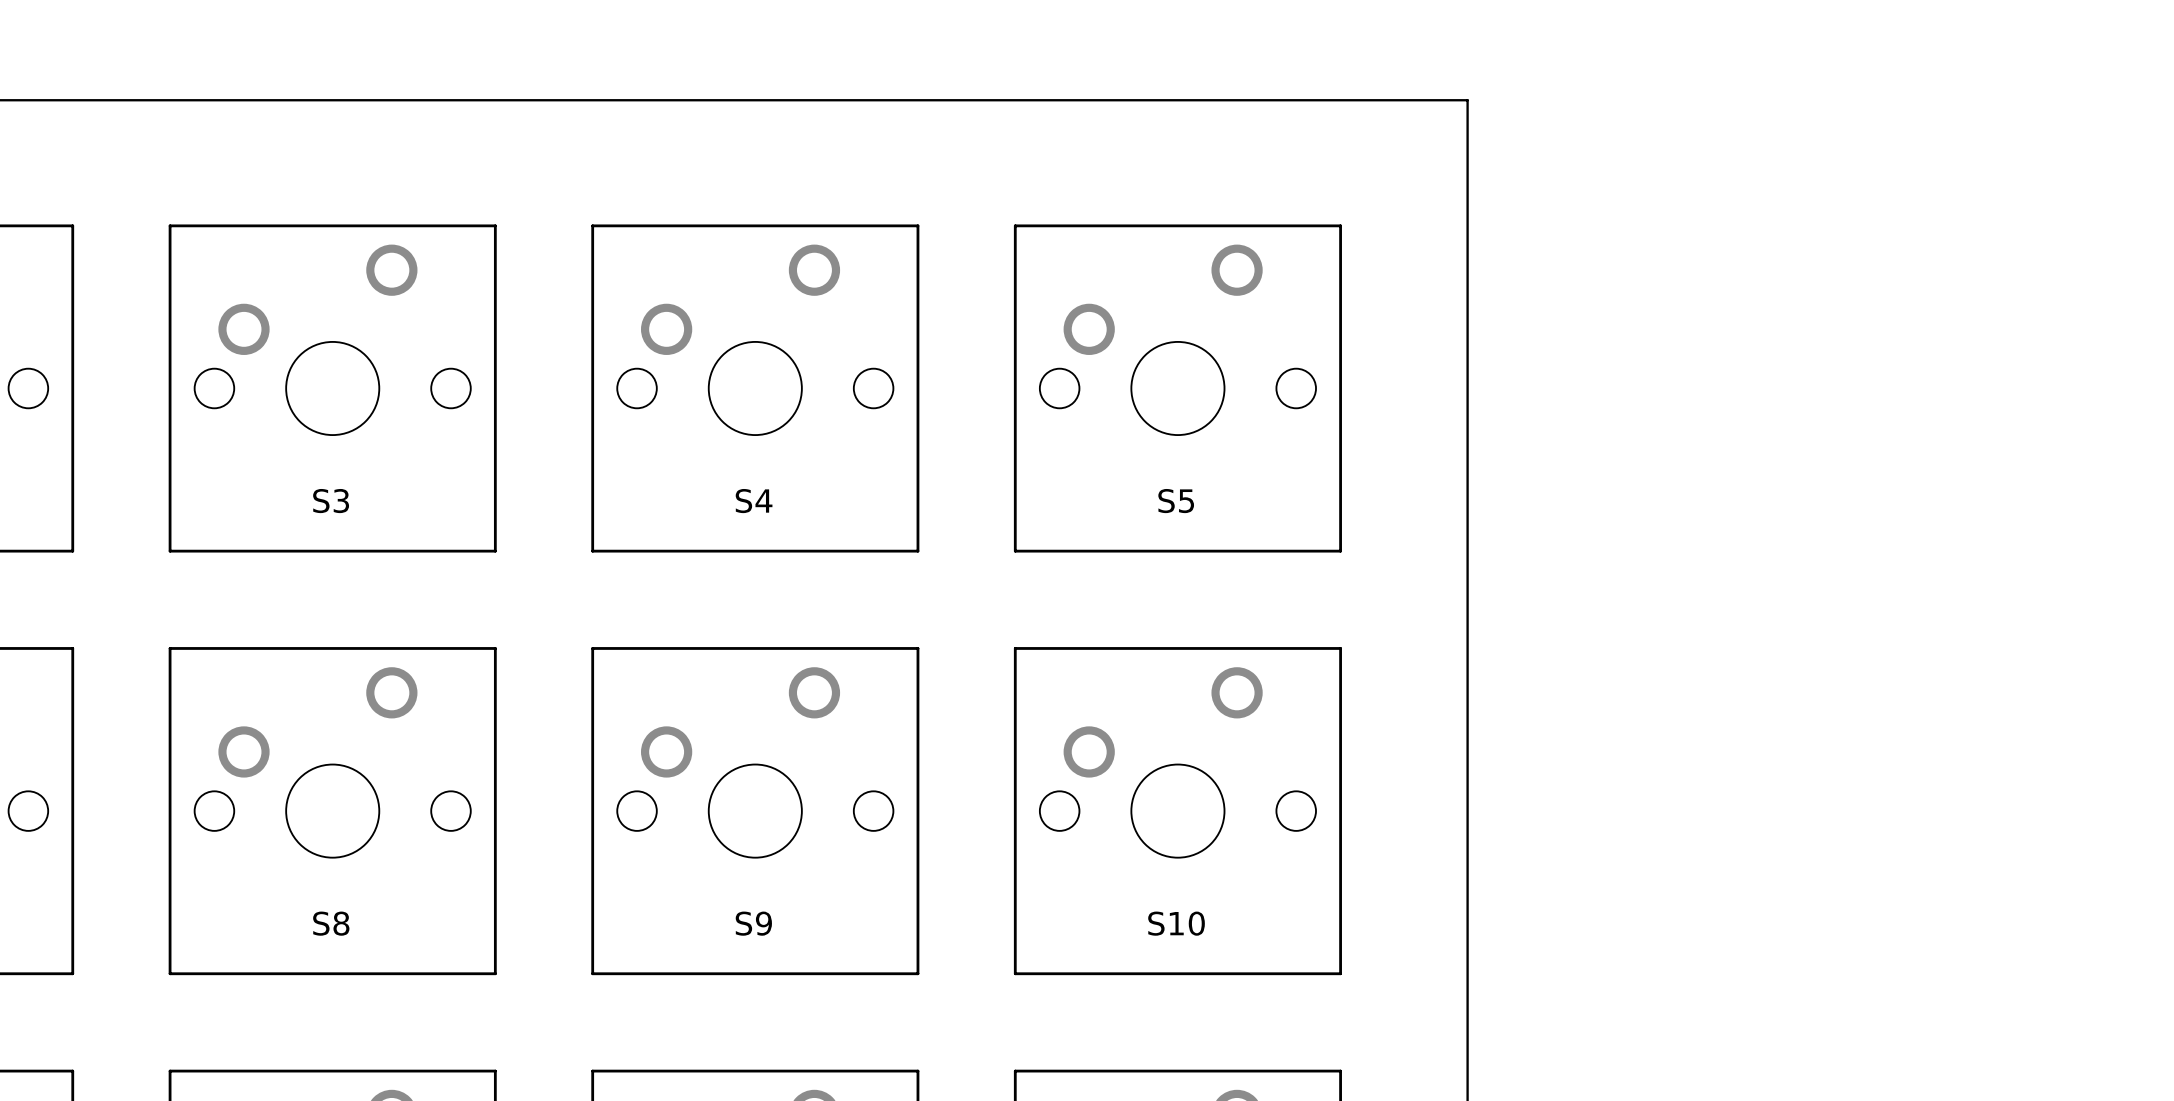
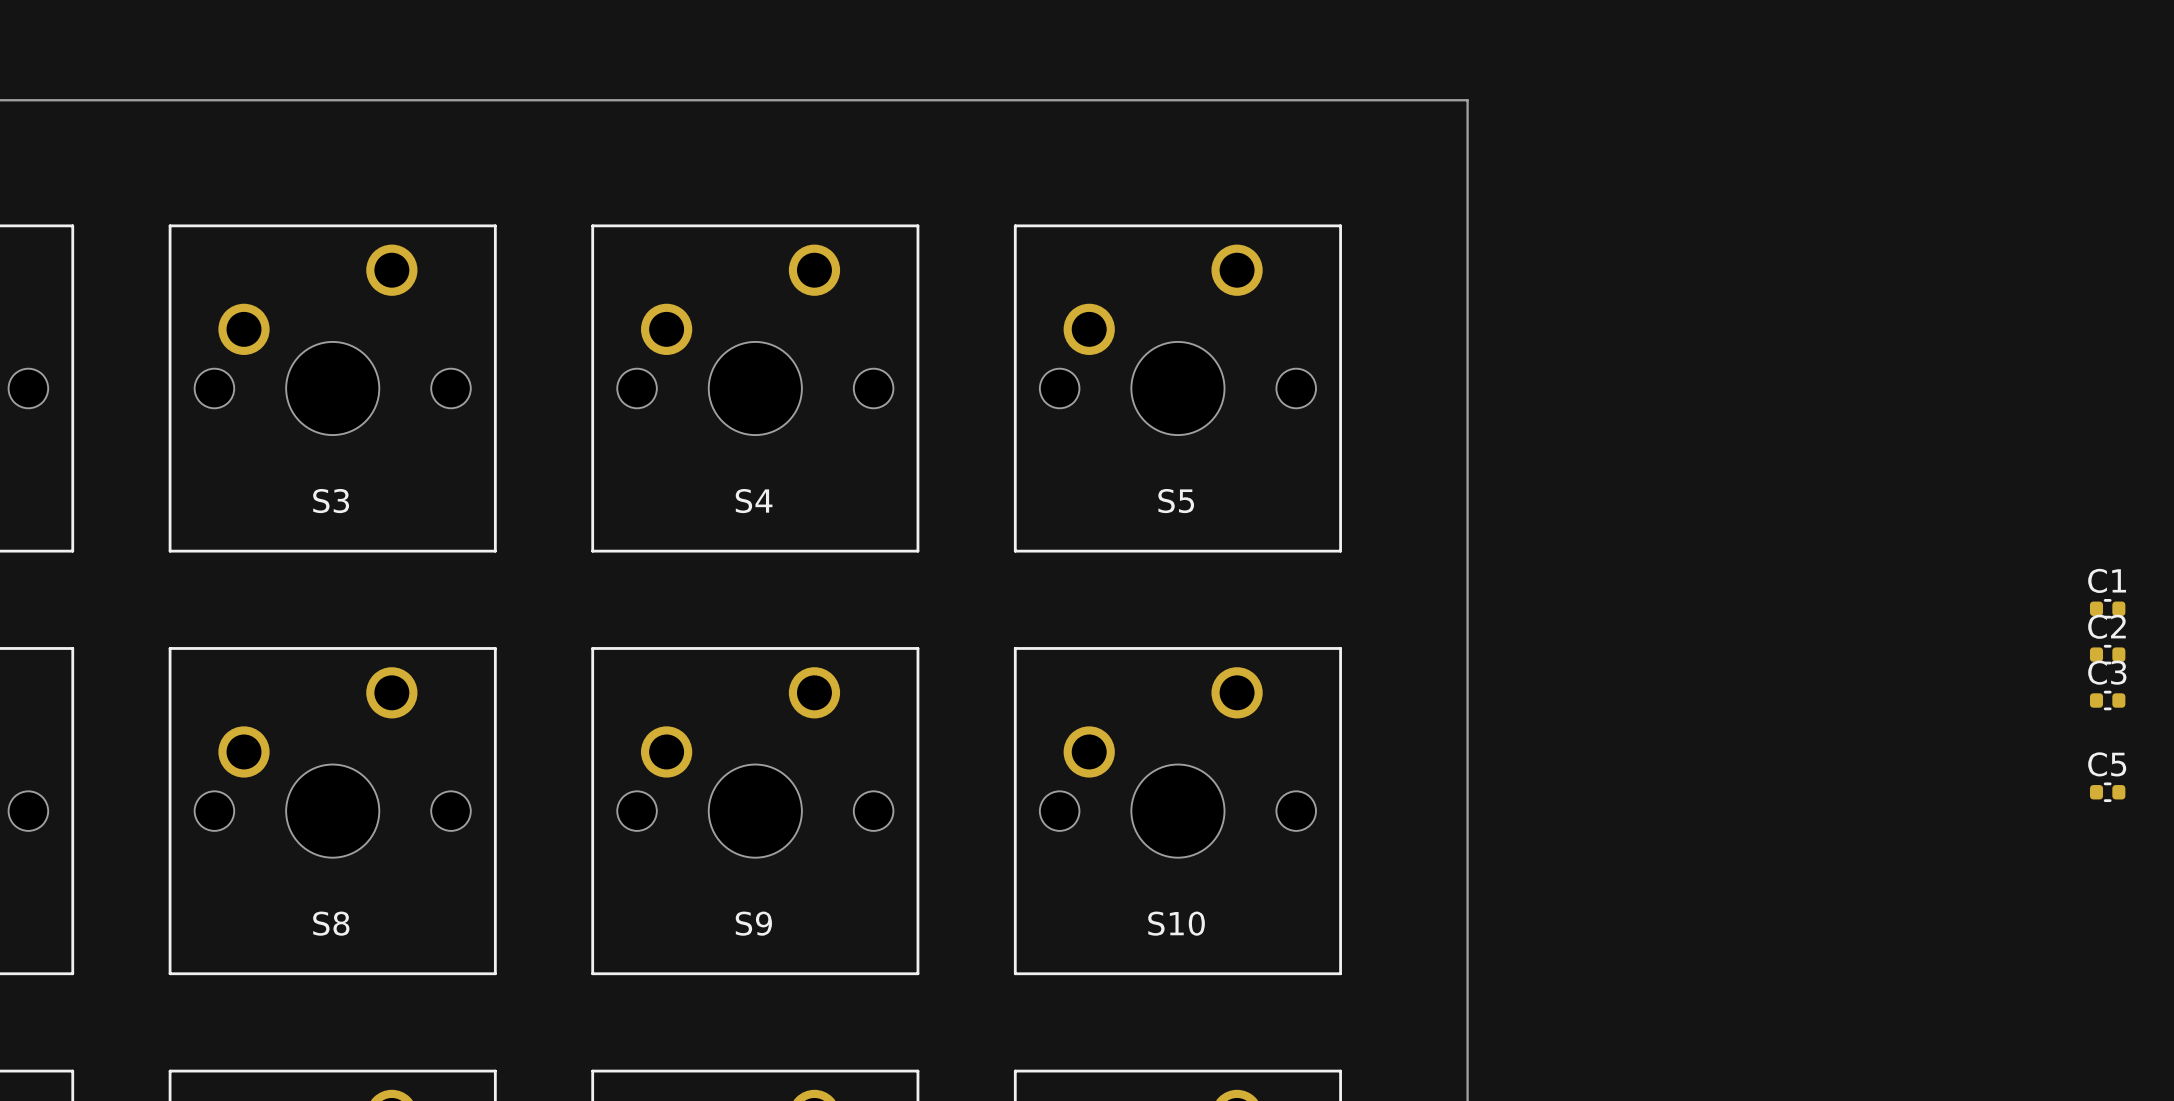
C1: none -> (2107, 608)
C2: none -> (2107, 654)
C3: none -> (2107, 700)
C5: none -> (2107, 792)

